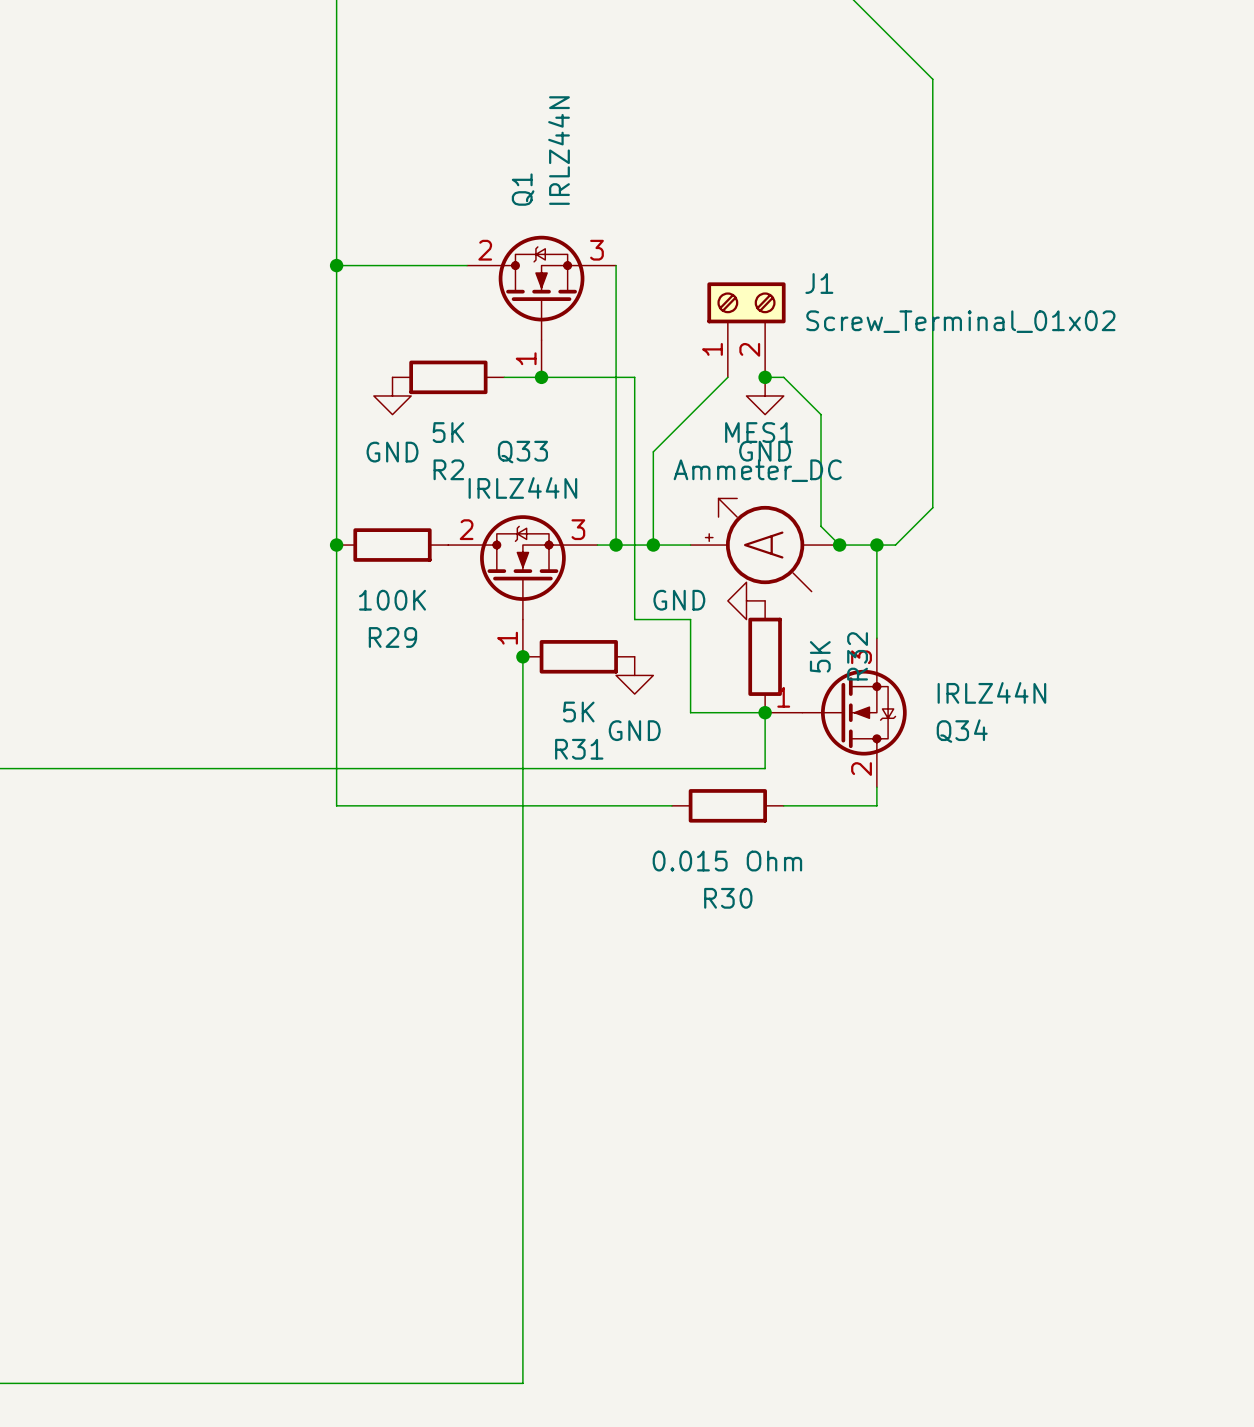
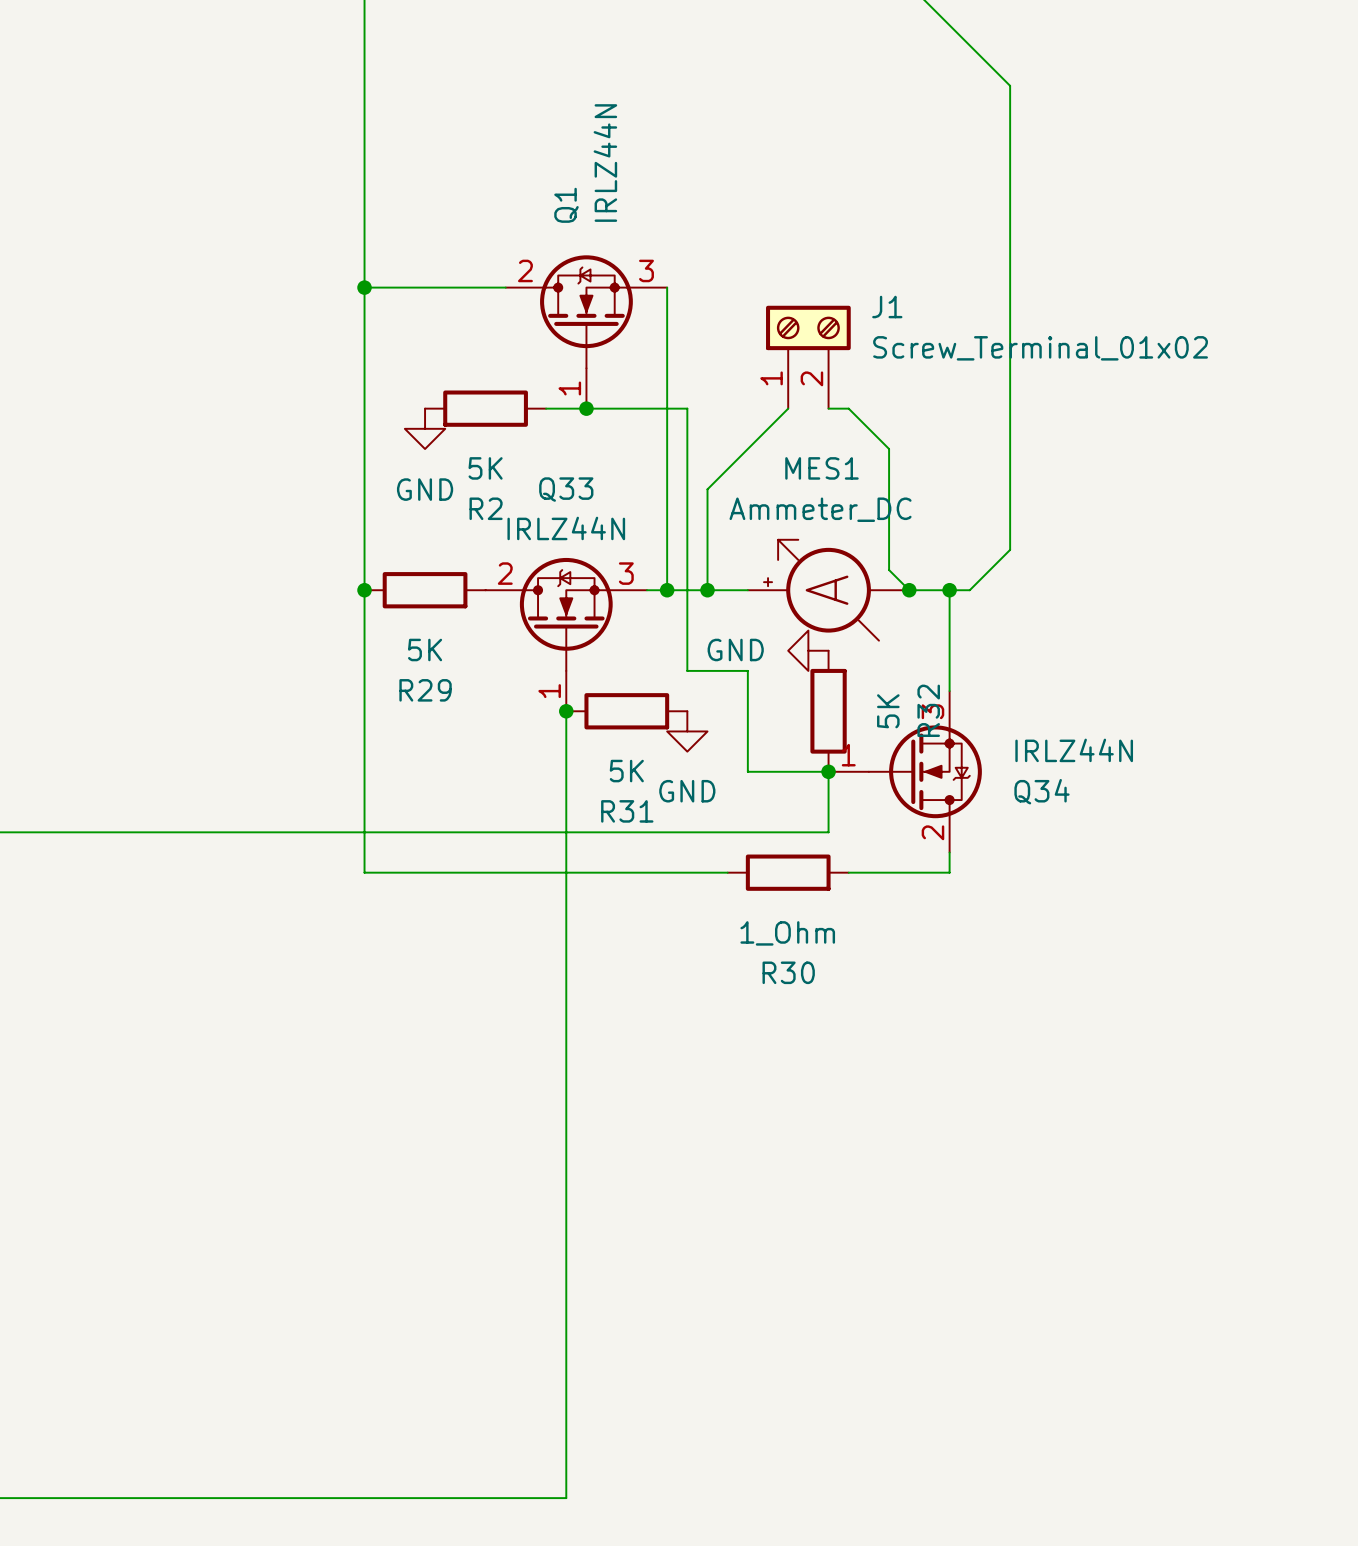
junction: (765, 377) -> none
power symbol: GND (765, 395) -> none
R29 value: 100K (392, 600) -> 5K (425, 649)
R30 value: 0.015 Ohm (727, 861) -> 1_Ohm (787, 933)

